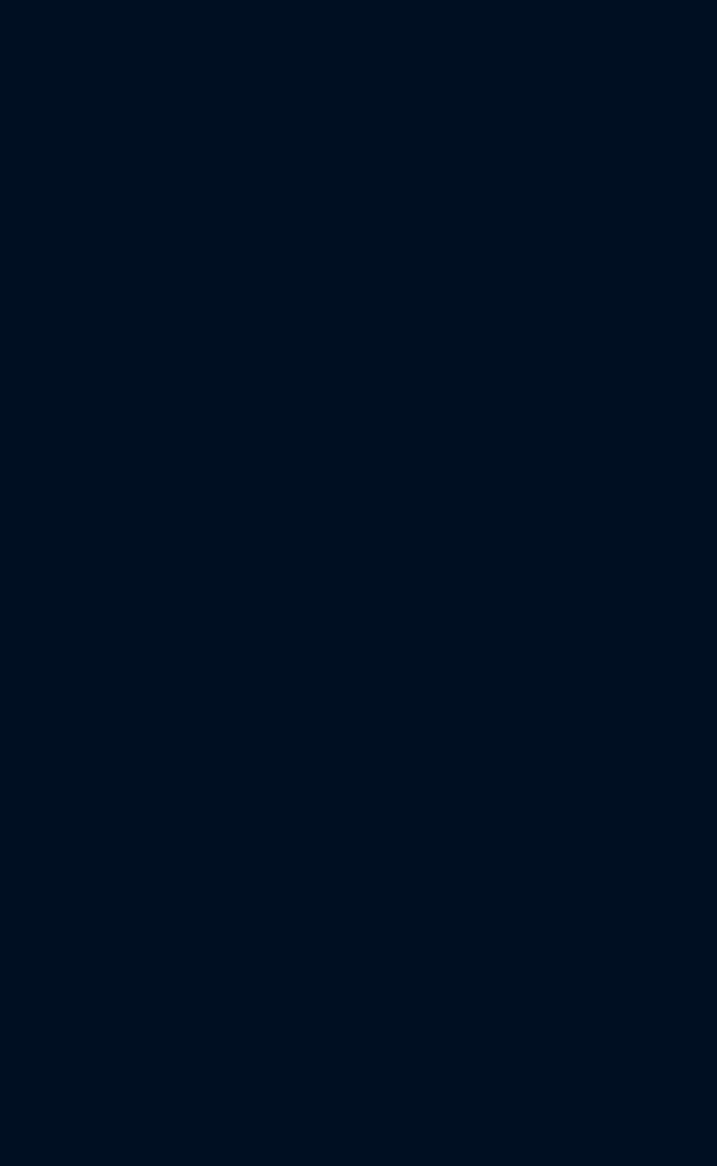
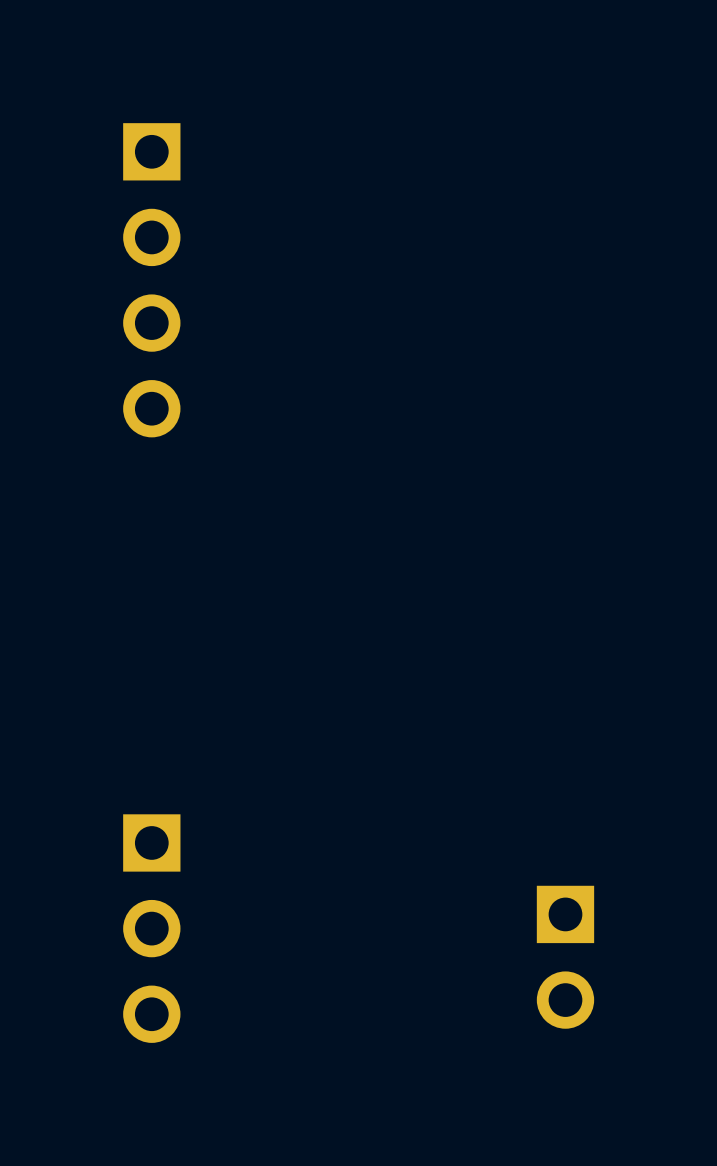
part: none -> (151, 280)
part: none -> (151, 928)
part: none -> (565, 957)

